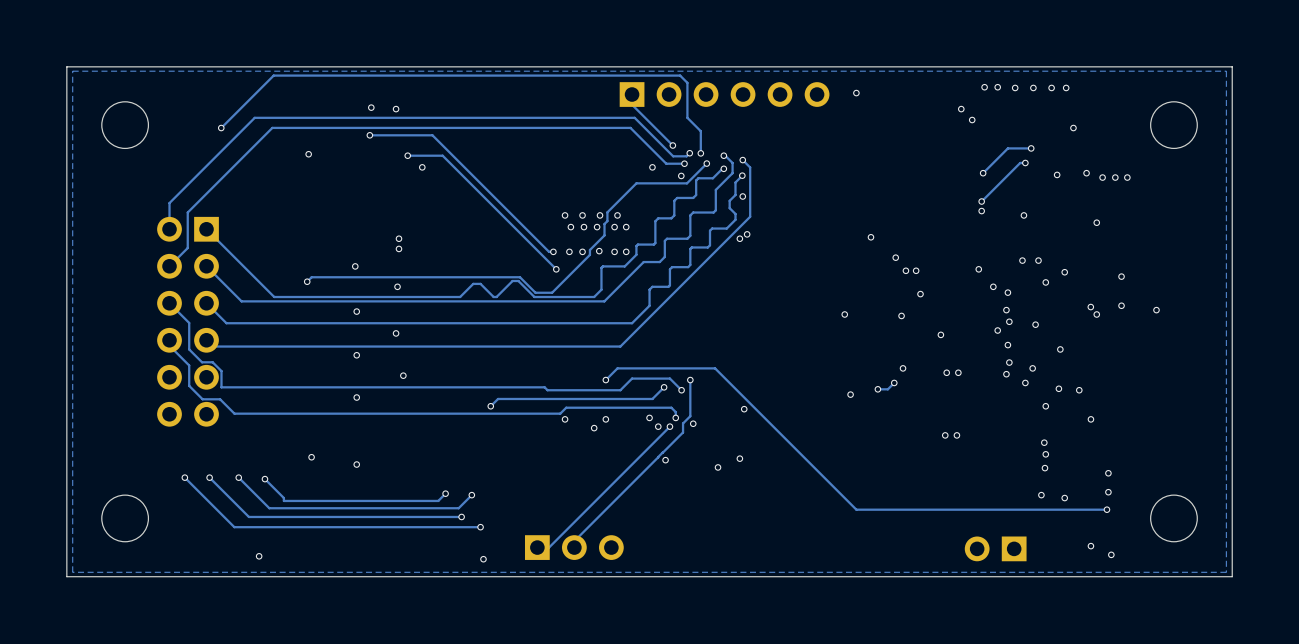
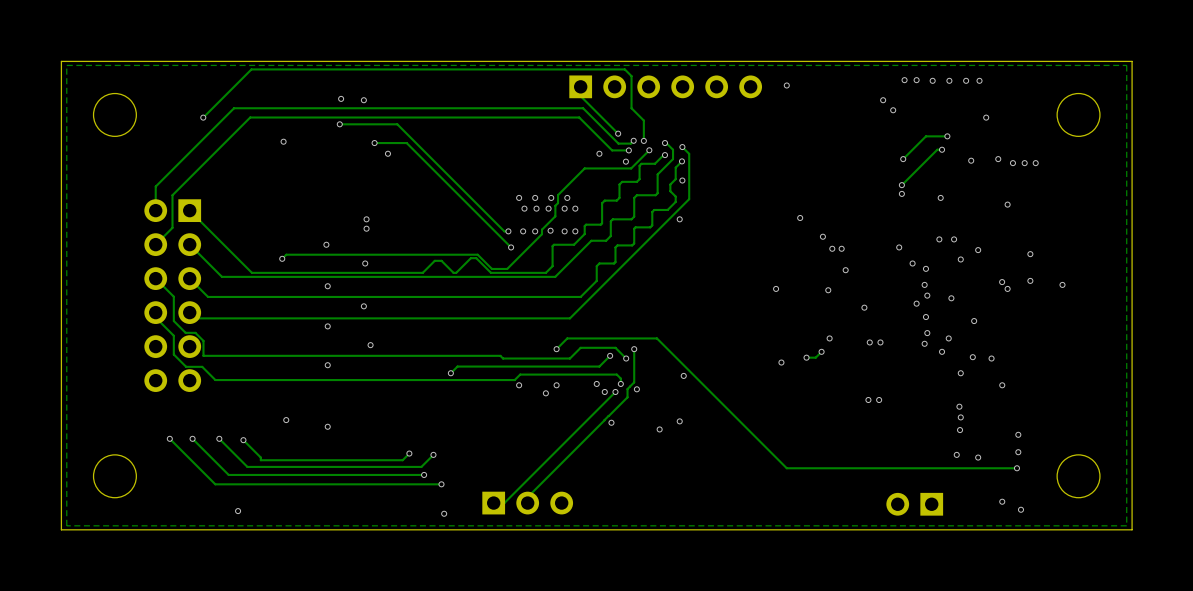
via: (747, 234) -> none

